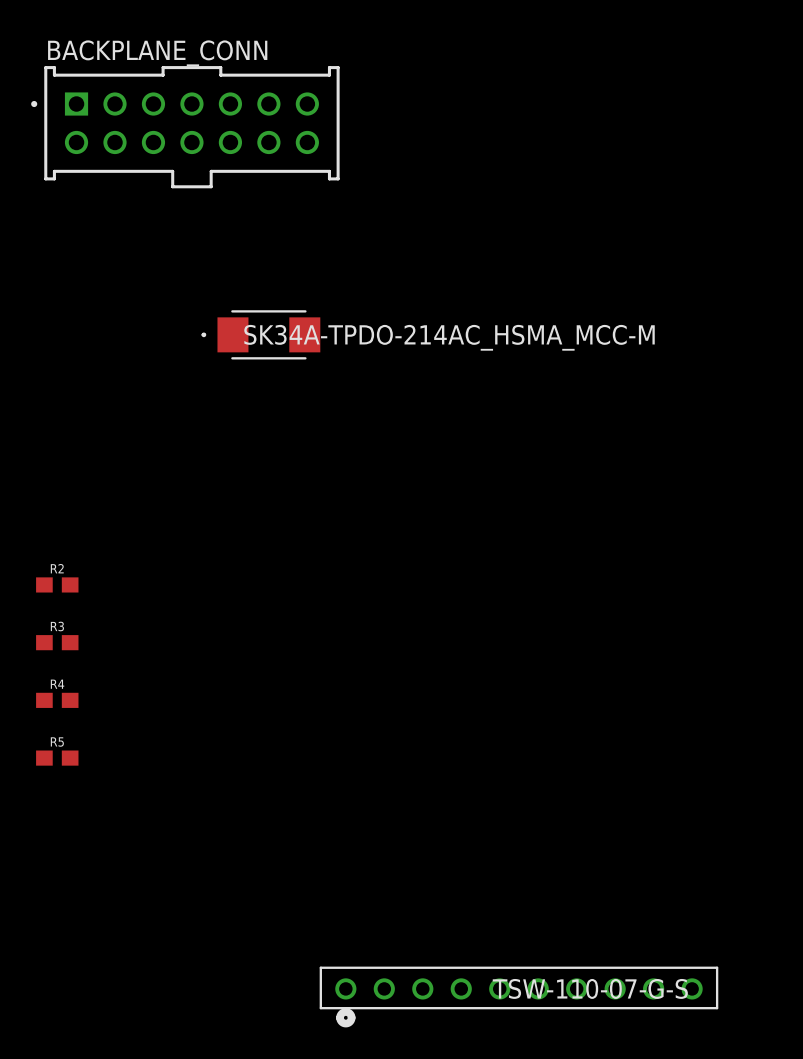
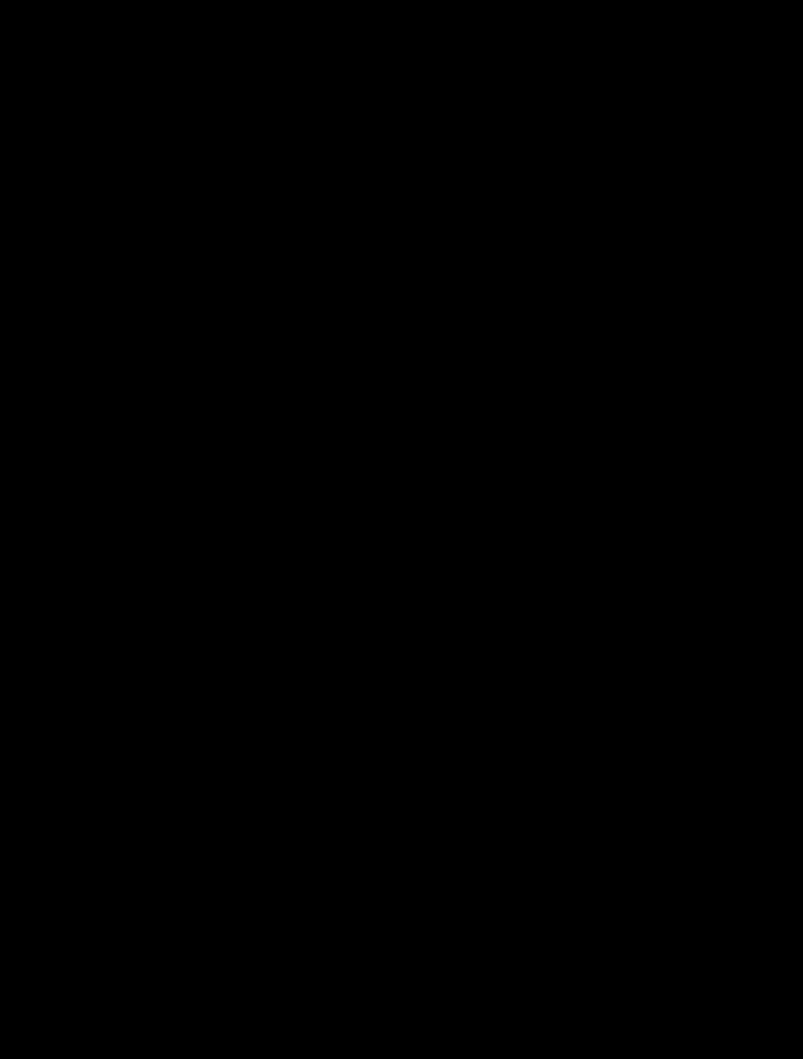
BACKPLANE_CONN: (185, 127) -> none
part: SK34A-TPDO-214AC_HSMA_MCC-M (260, 334) -> none
R2: (57, 584) -> none
R3: (57, 642) -> none
R4: (57, 700) -> none
R5: (57, 758) -> none
part: TSW-110-07-G-S (518, 997) -> none

